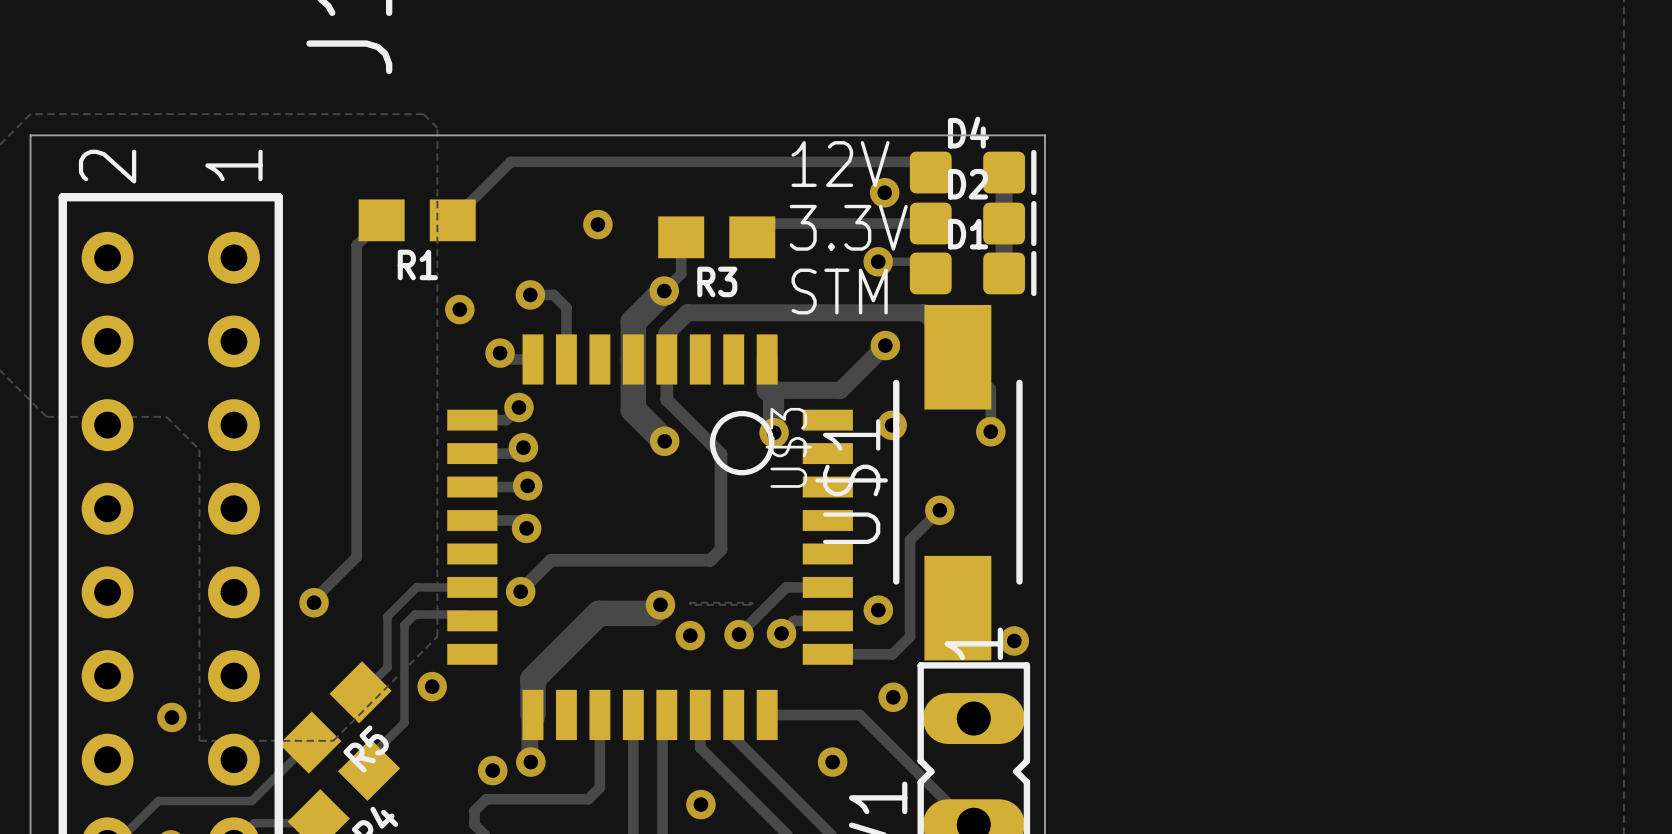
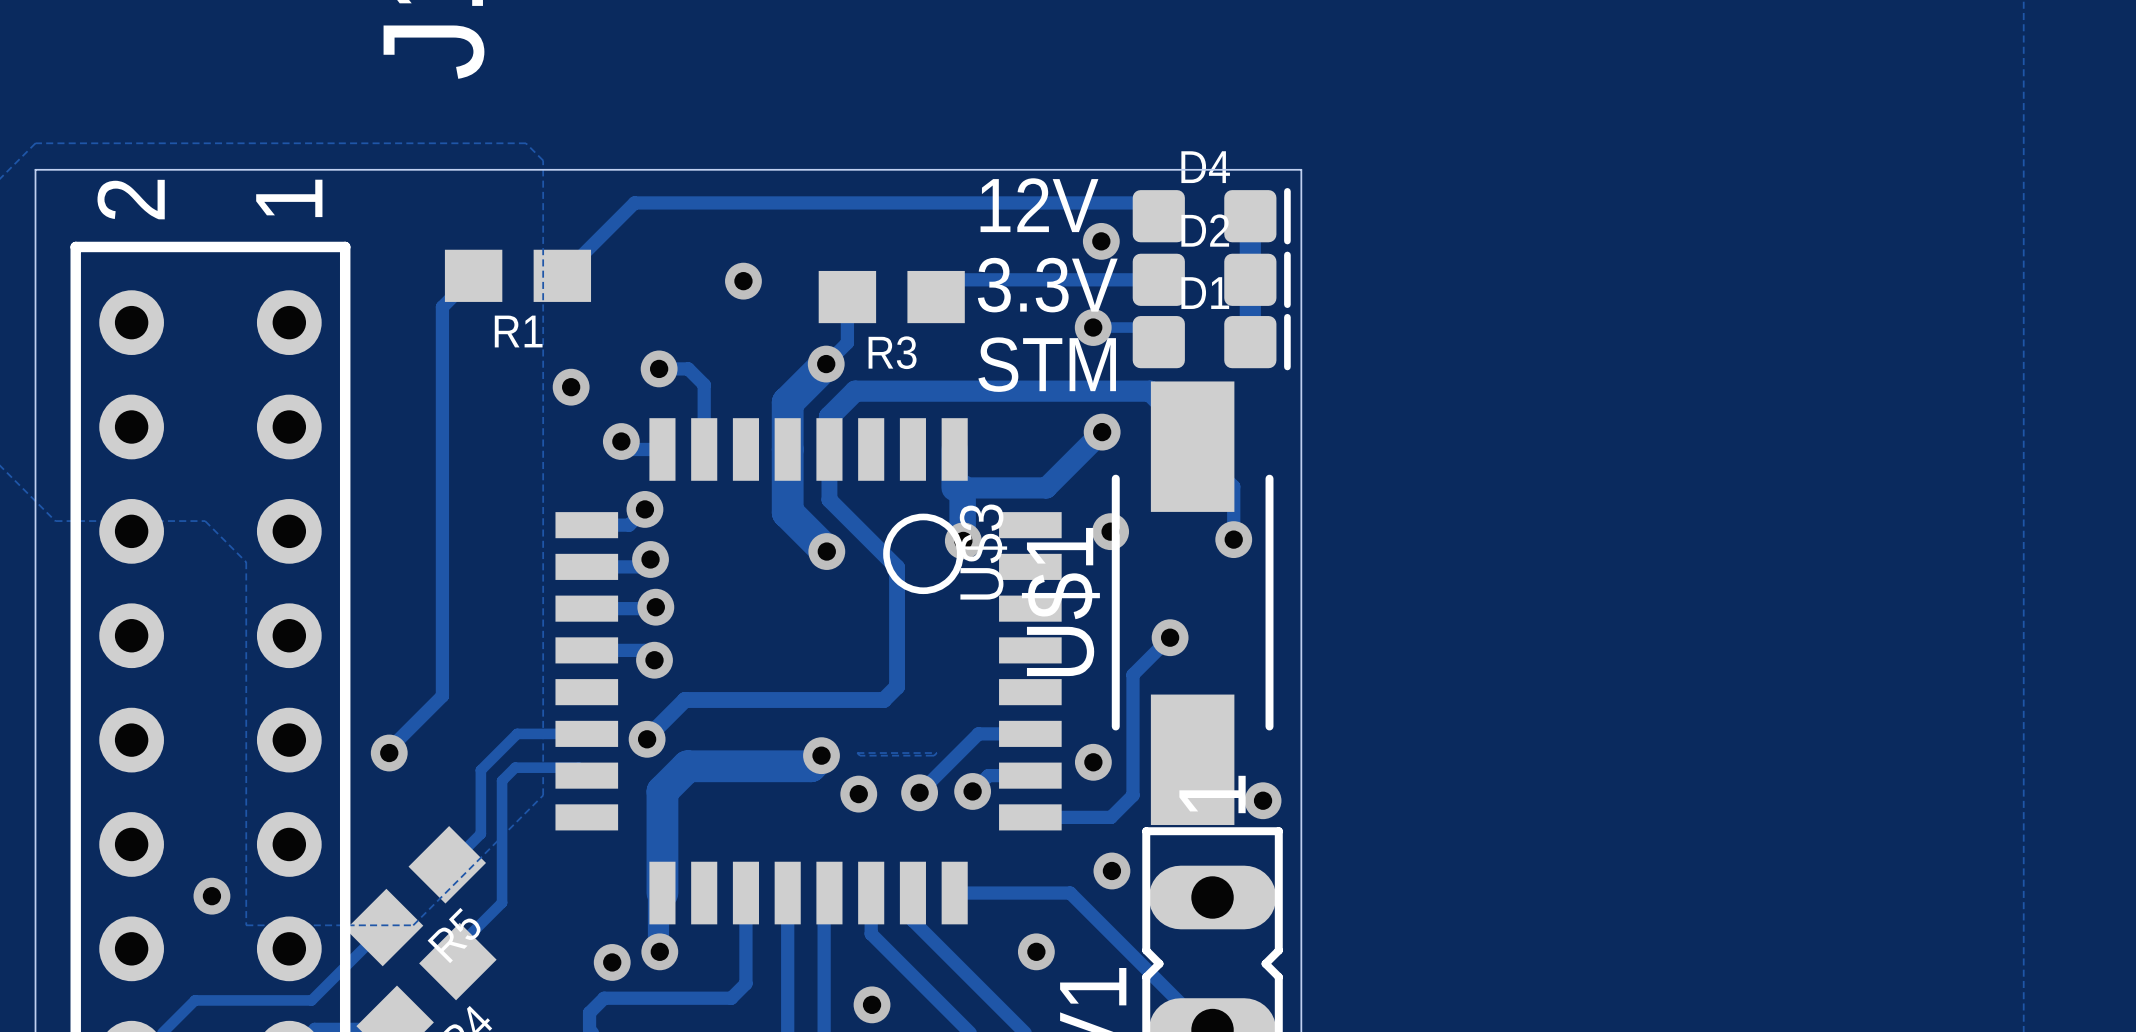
track: (598, 613) (532, 679) -> (744, 766) (687, 766) (662, 791) (662, 848)
via: (432, 686) -> none

